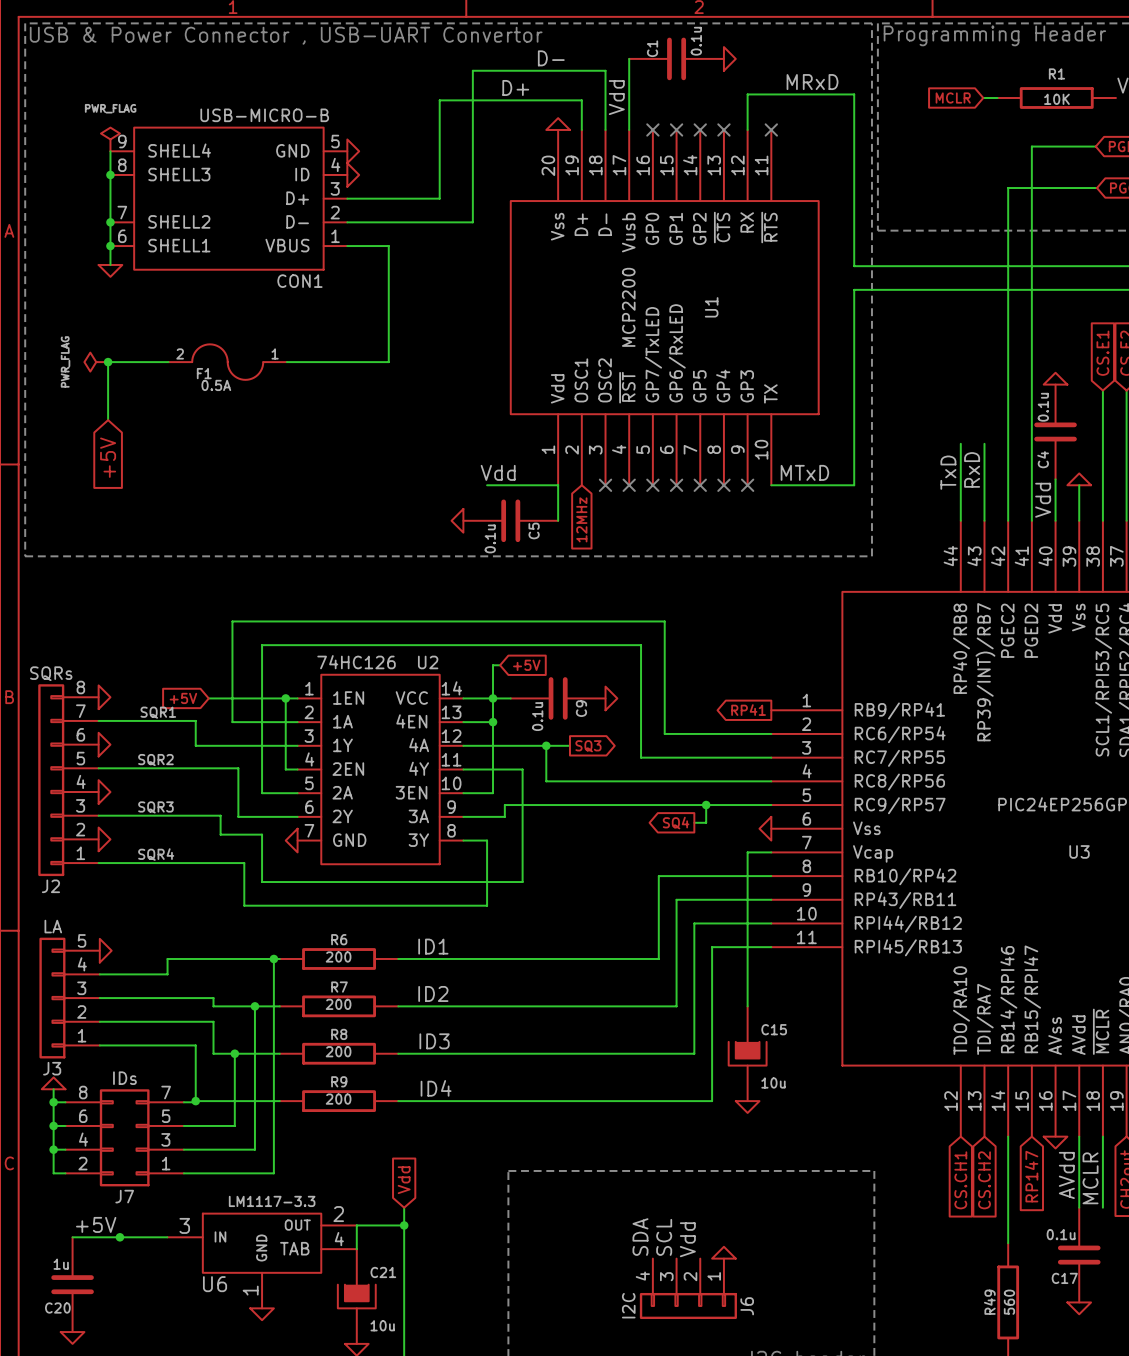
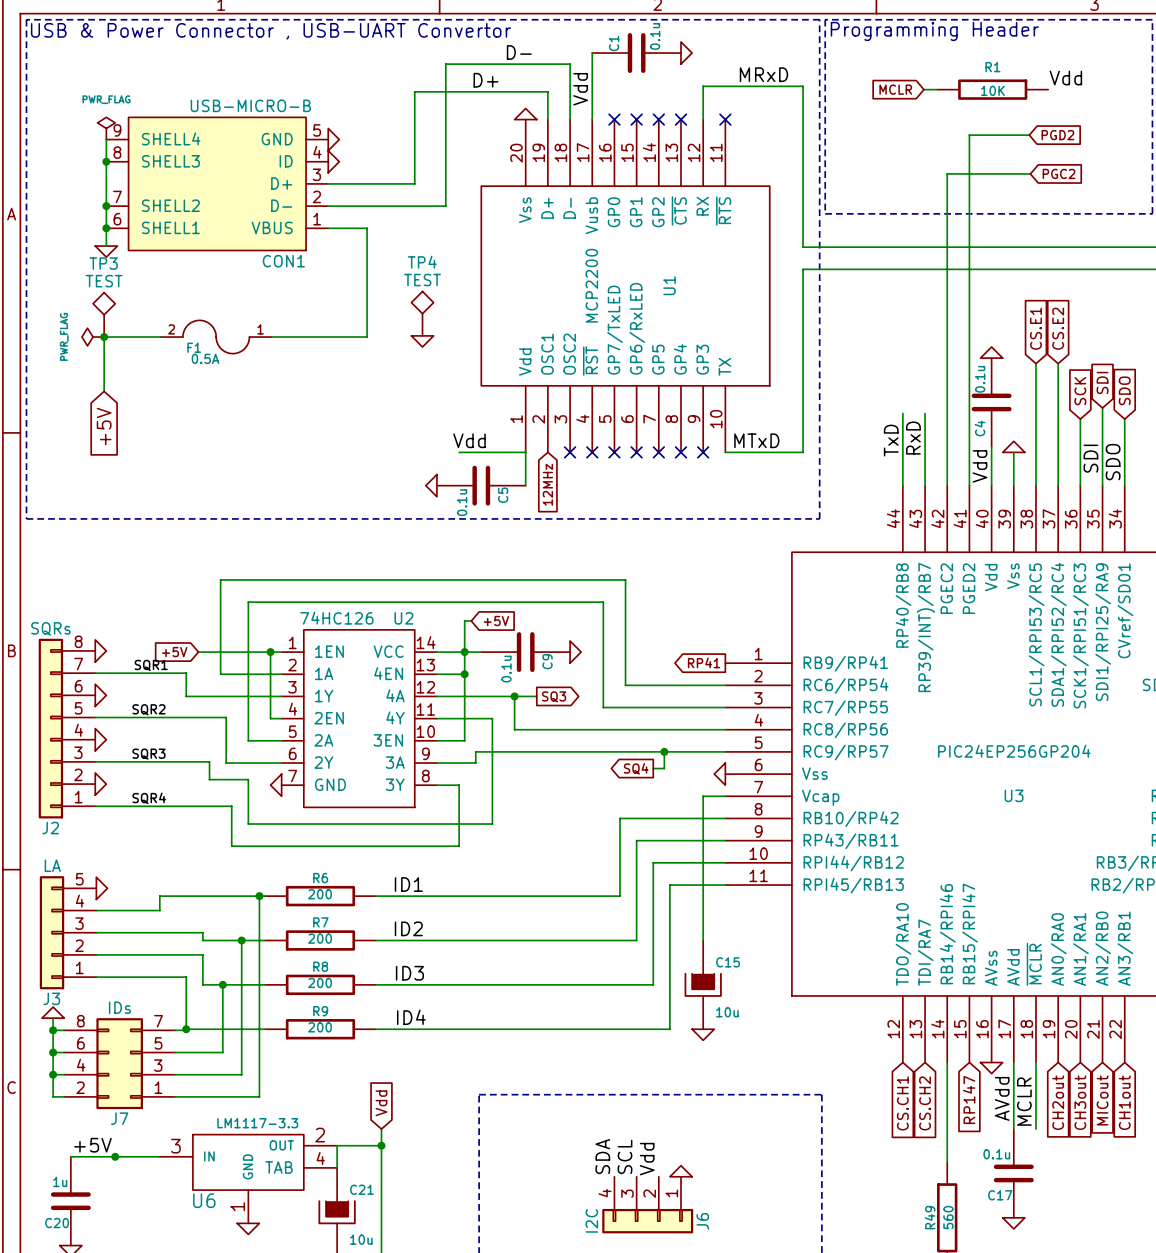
TP4: none -> TEST (422, 313)
TP3: none -> TEST (104, 314)
power symbol: none -> (422, 341)

